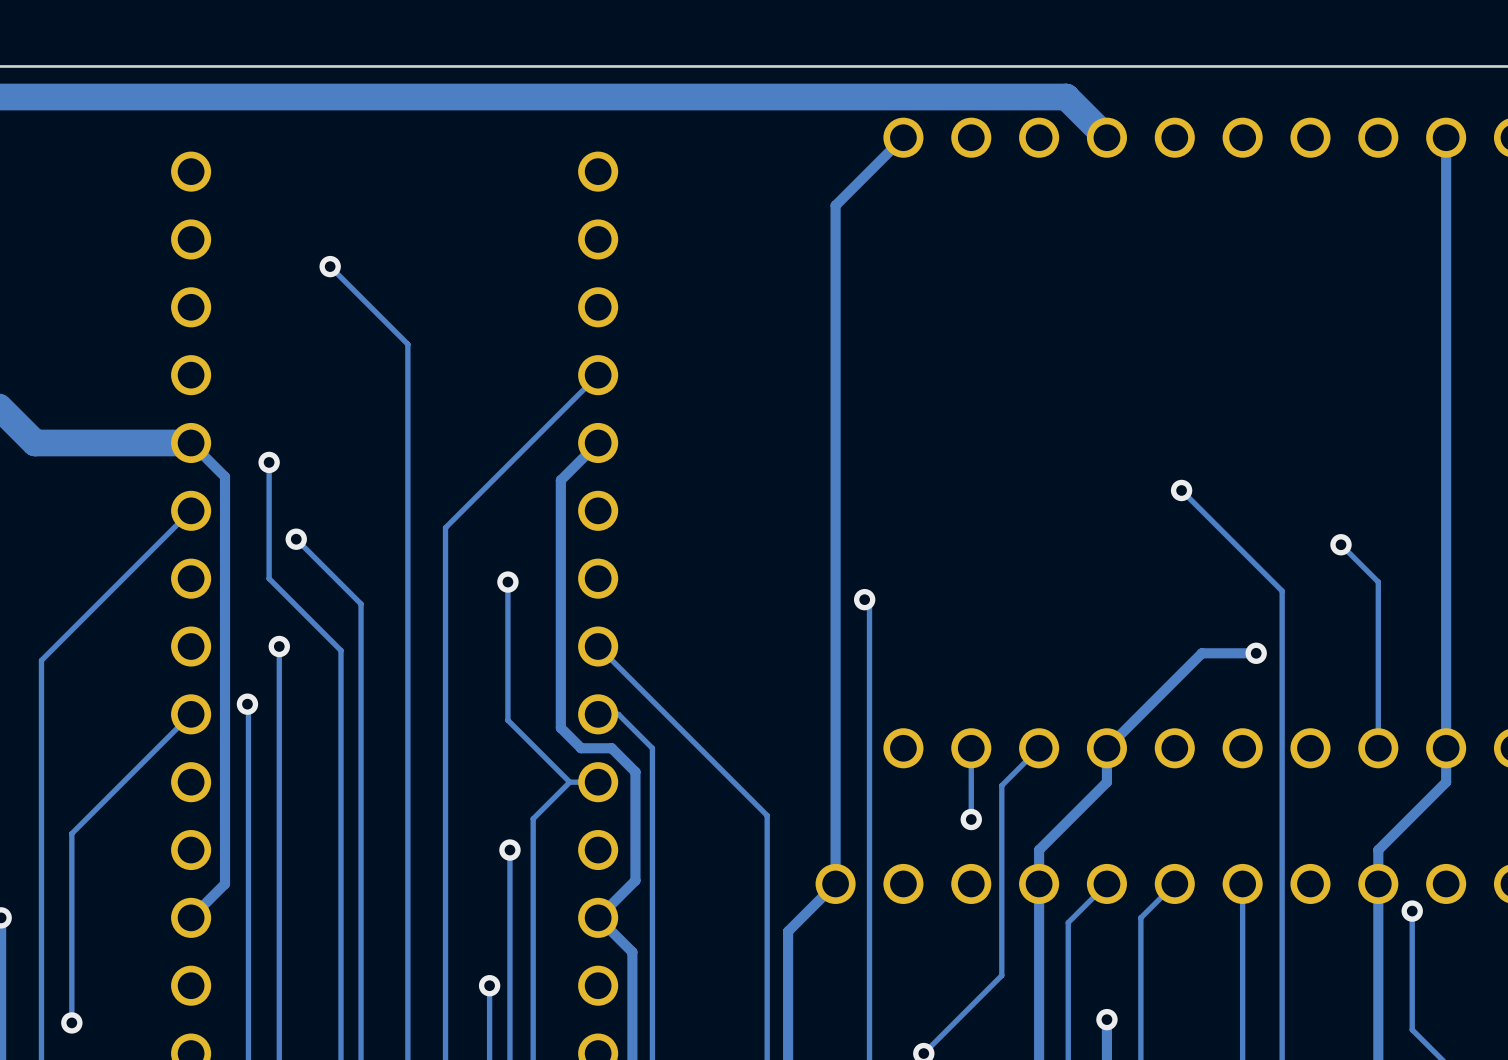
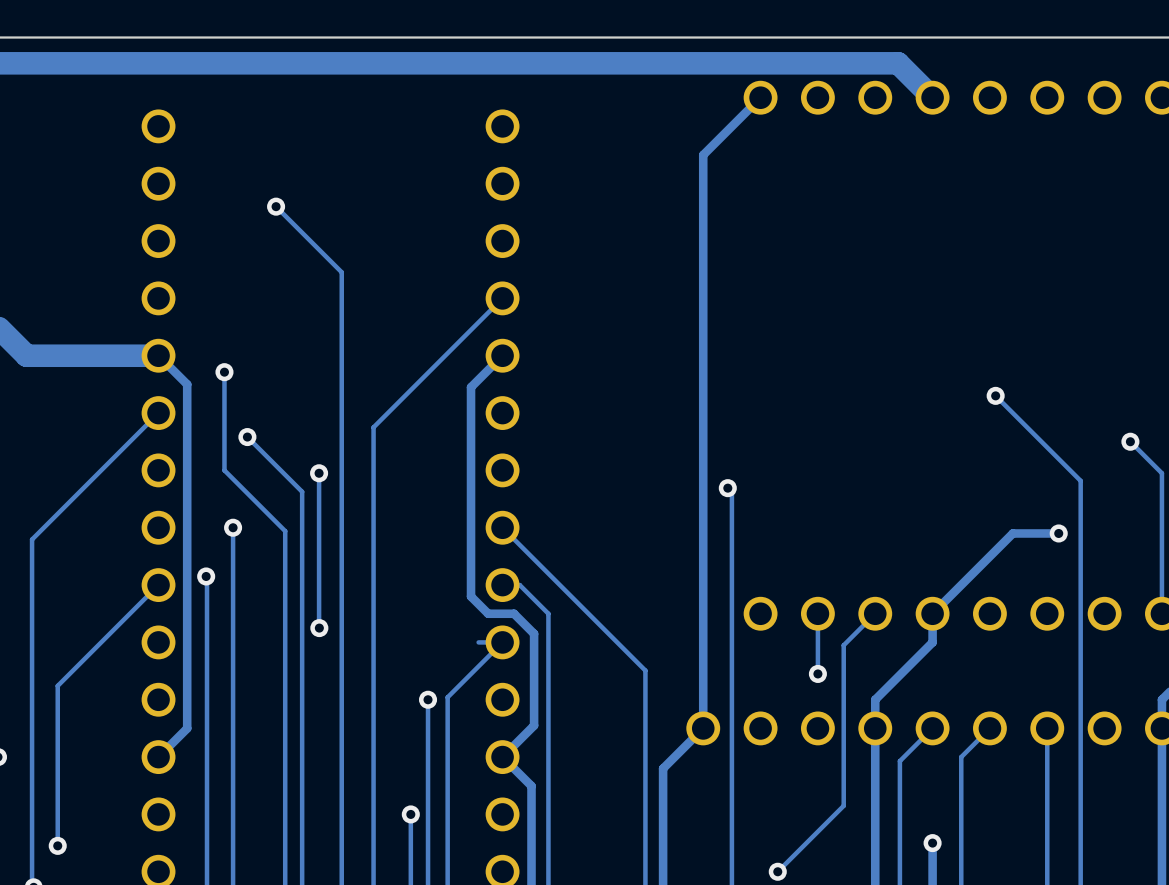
track: none -> (319, 473) (319, 627)
via: none -> (319, 473)
track: (507, 582) (507, 720) (569, 782) (533, 818) (533, 847) -> (502, 642) (447, 697)
via: (507, 582) -> none
via: none -> (319, 628)

